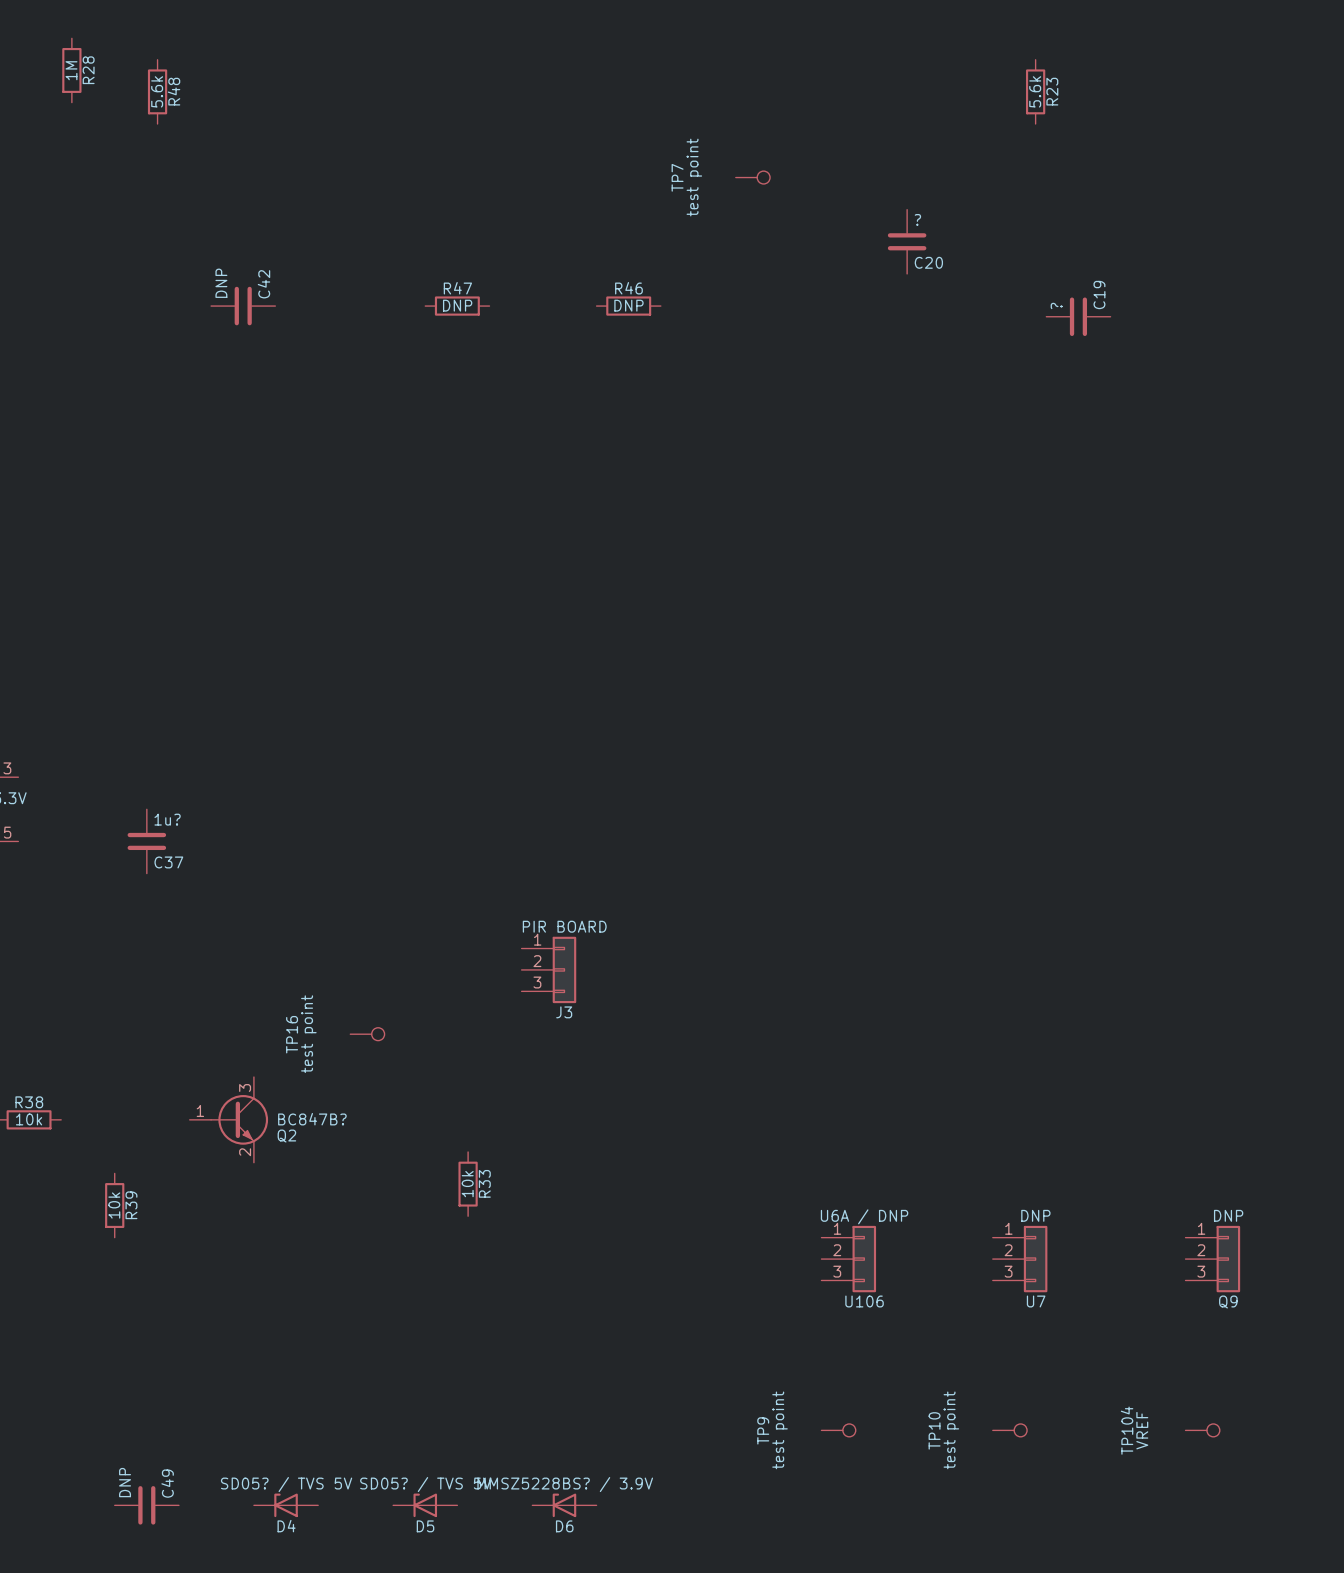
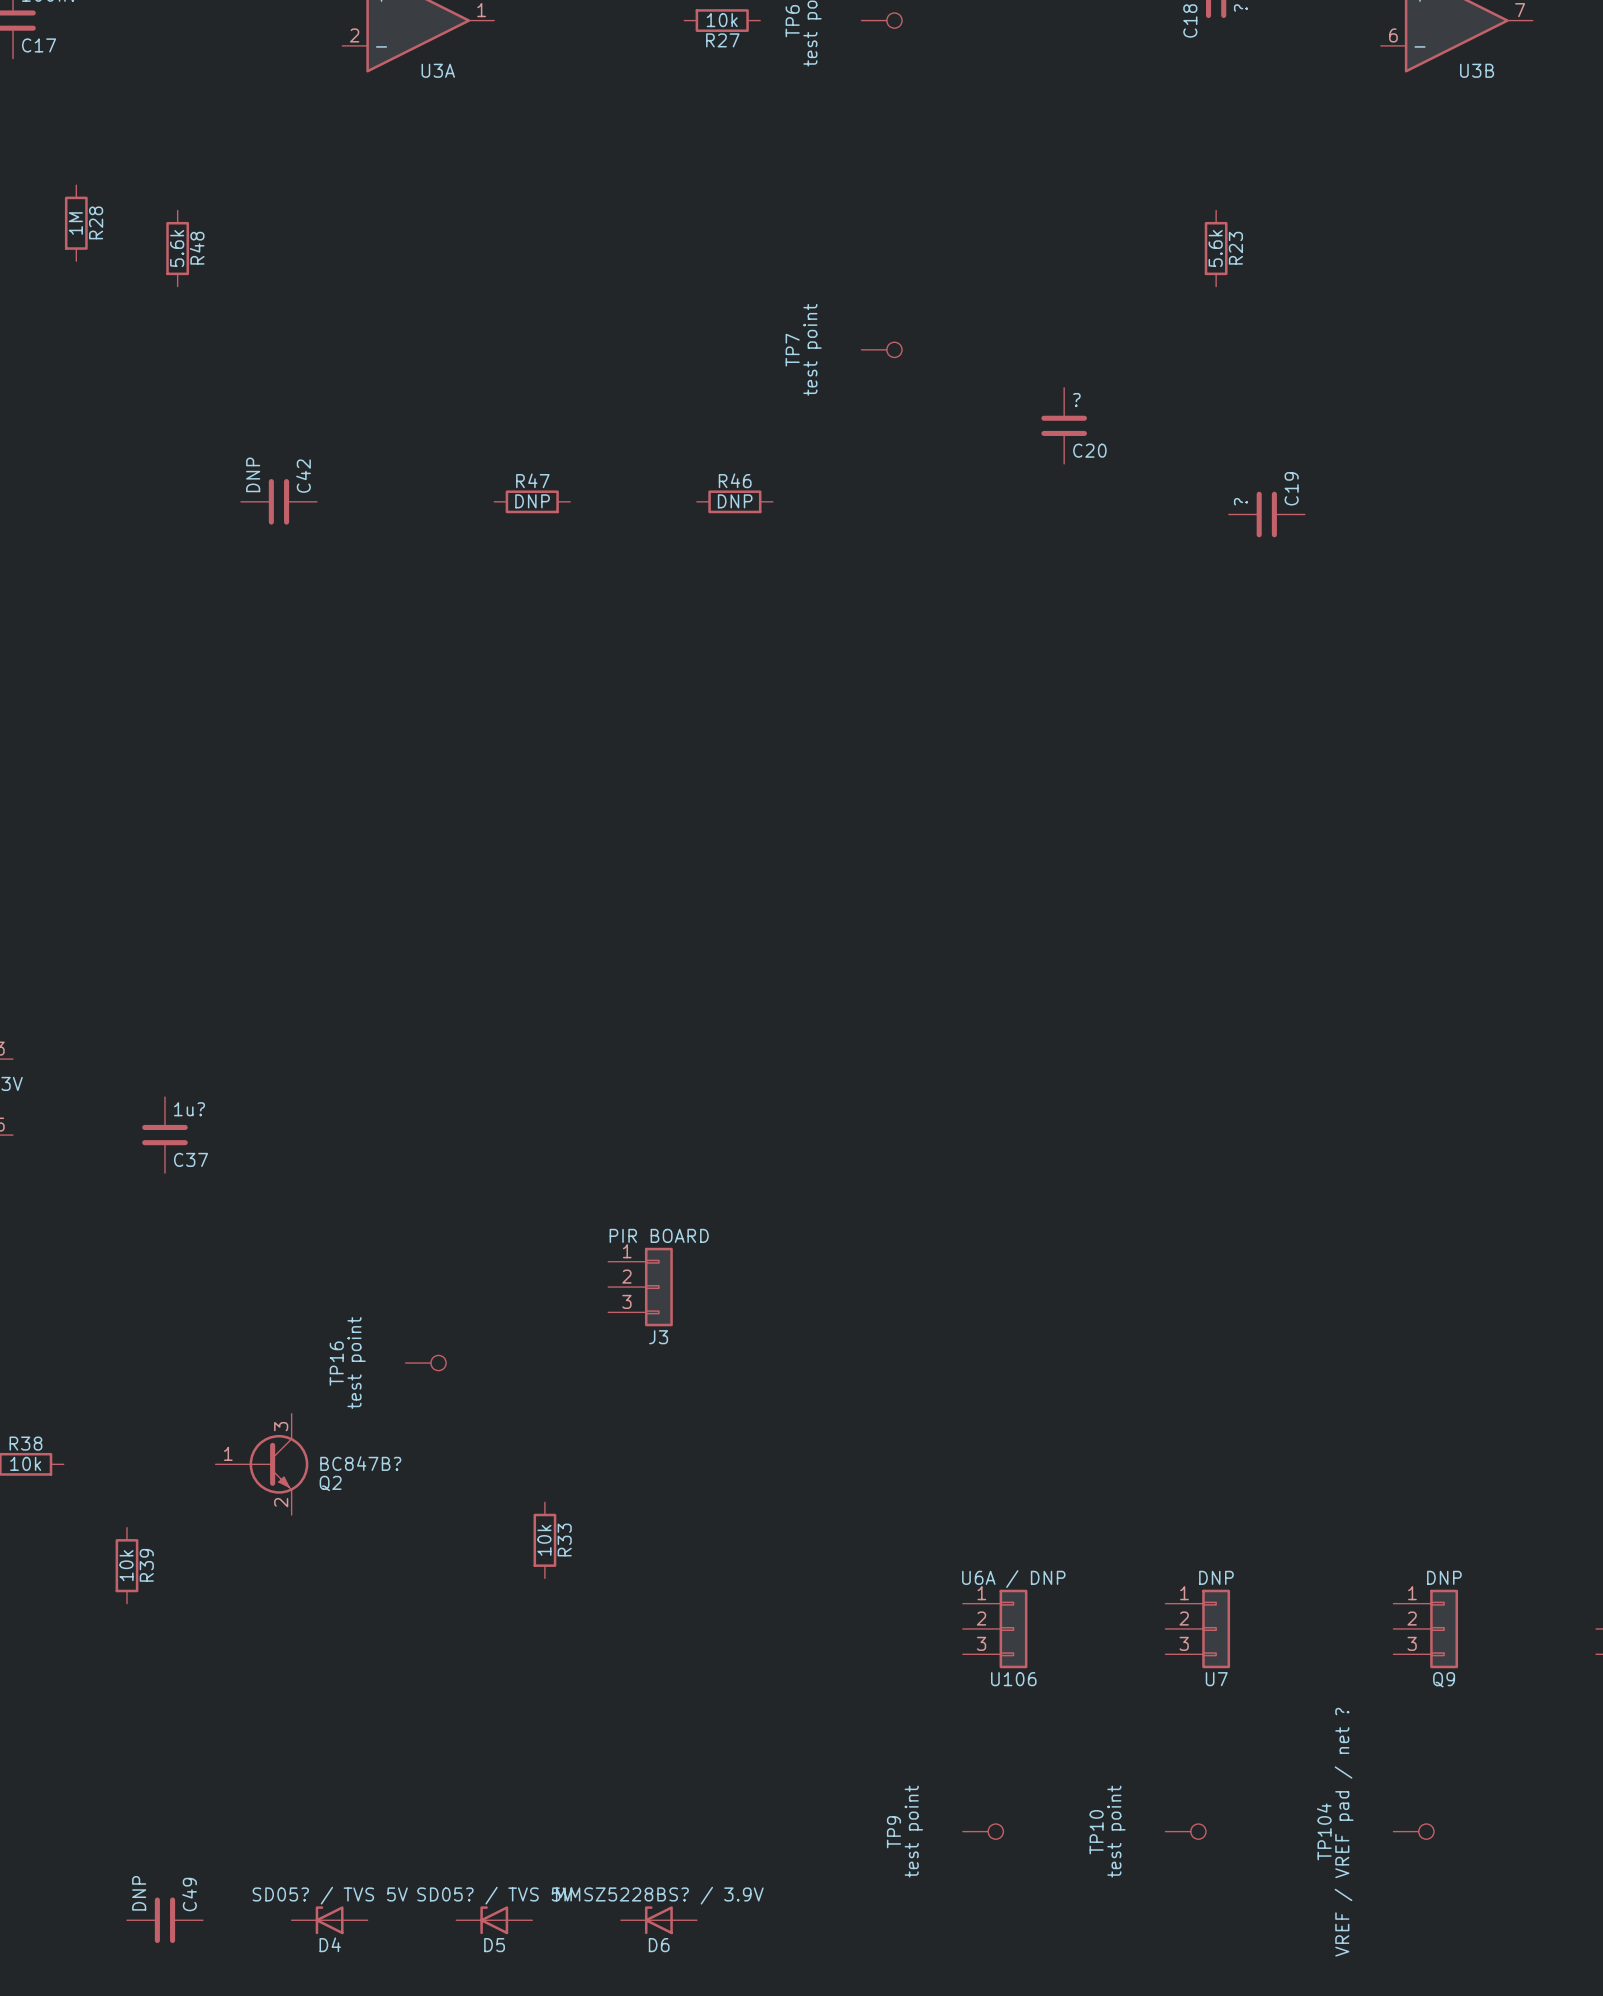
TP104 value: VREF (1142, 1430) -> VREF / VREF pad / net ? (1344, 1832)

